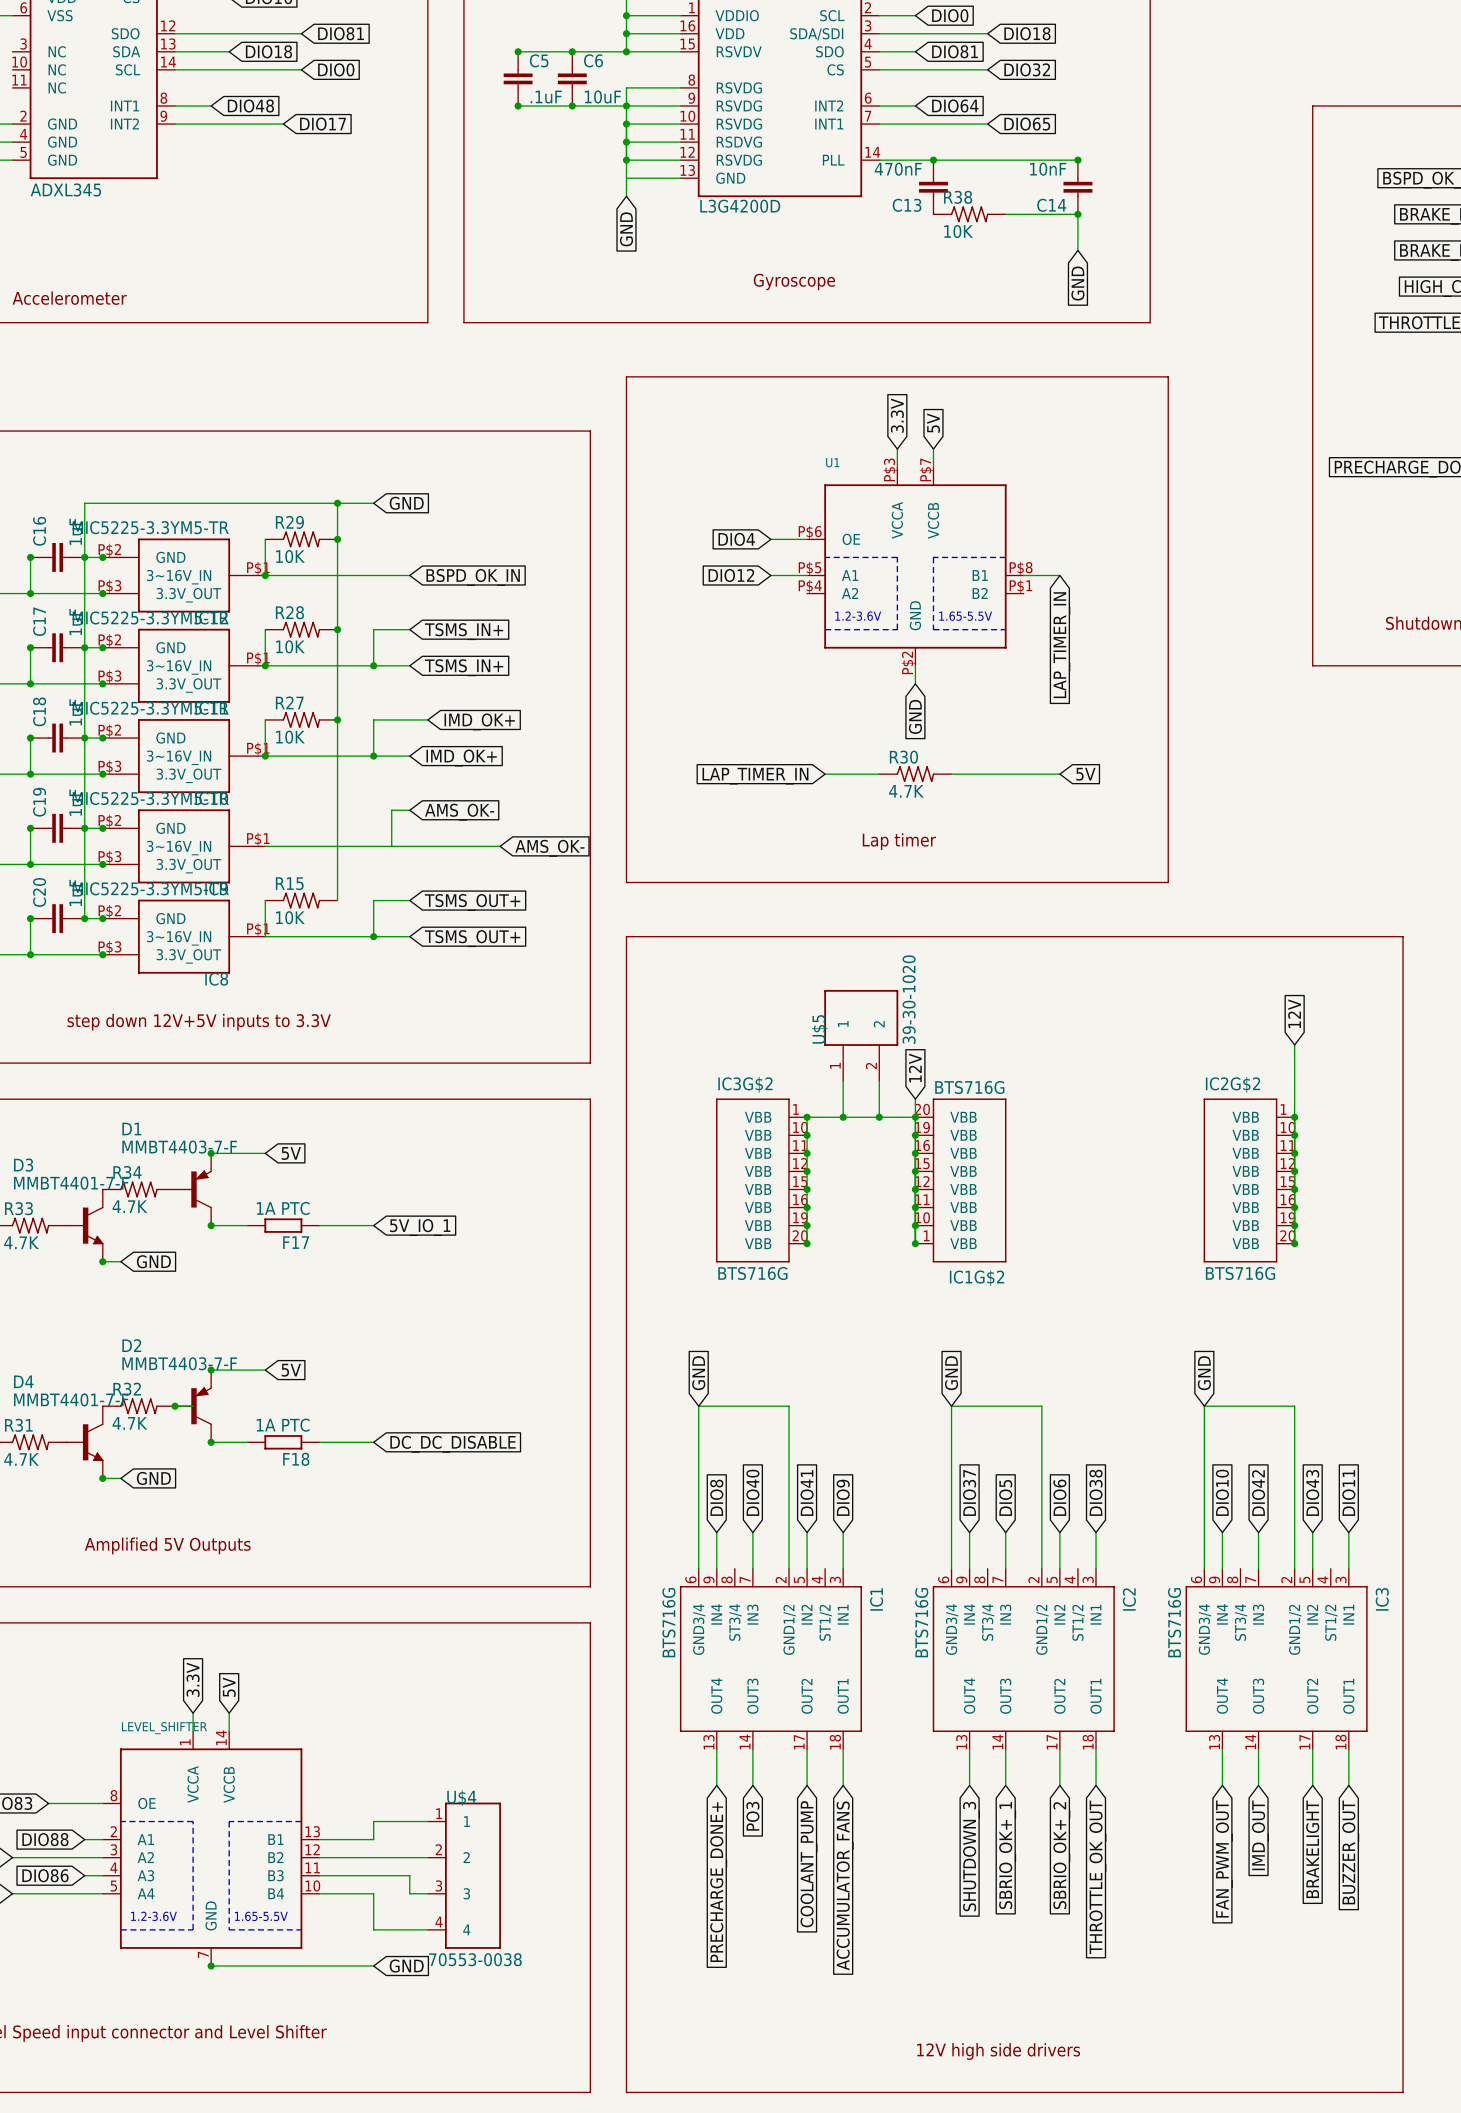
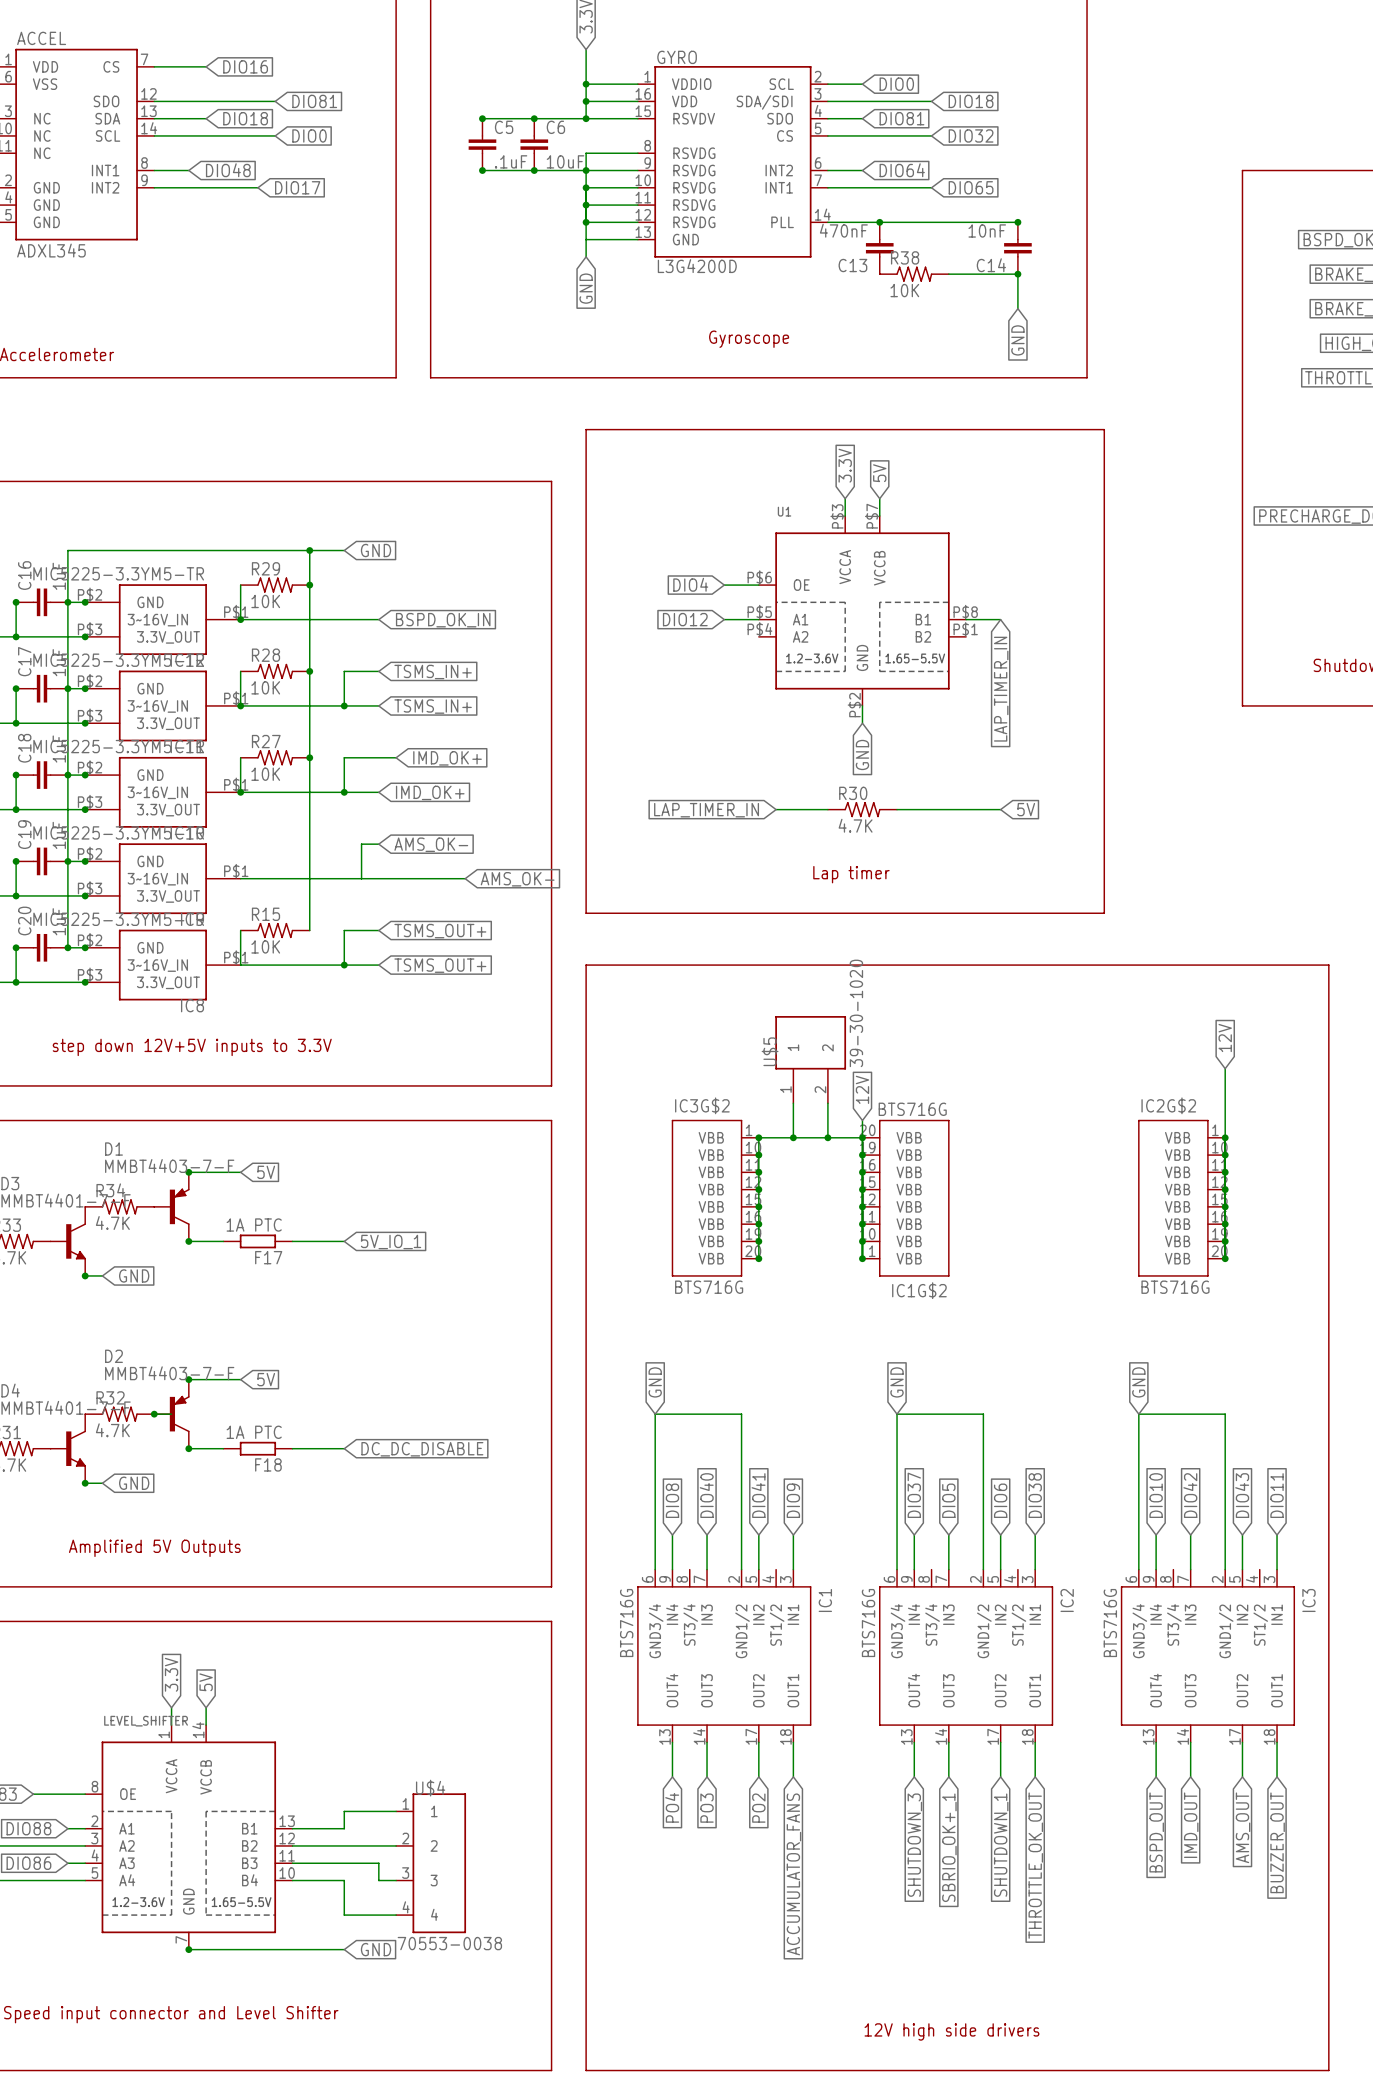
global label: BRAKELIGHT (1312, 1849) -> AMS_OUT (1243, 1827)
global label: SBRIO_OK+_2 (1061, 1855) -> SHUTDOWN_1 (1001, 1845)
global label: FAN_PWM_OUT (1224, 1859) -> BSPD_OUT (1156, 1832)
global label: COOLANT_PUMP (809, 1864) -> PO2 (758, 1808)
global label: PRECHARGE_DONE+ (718, 1882) -> PO4 (672, 1807)

